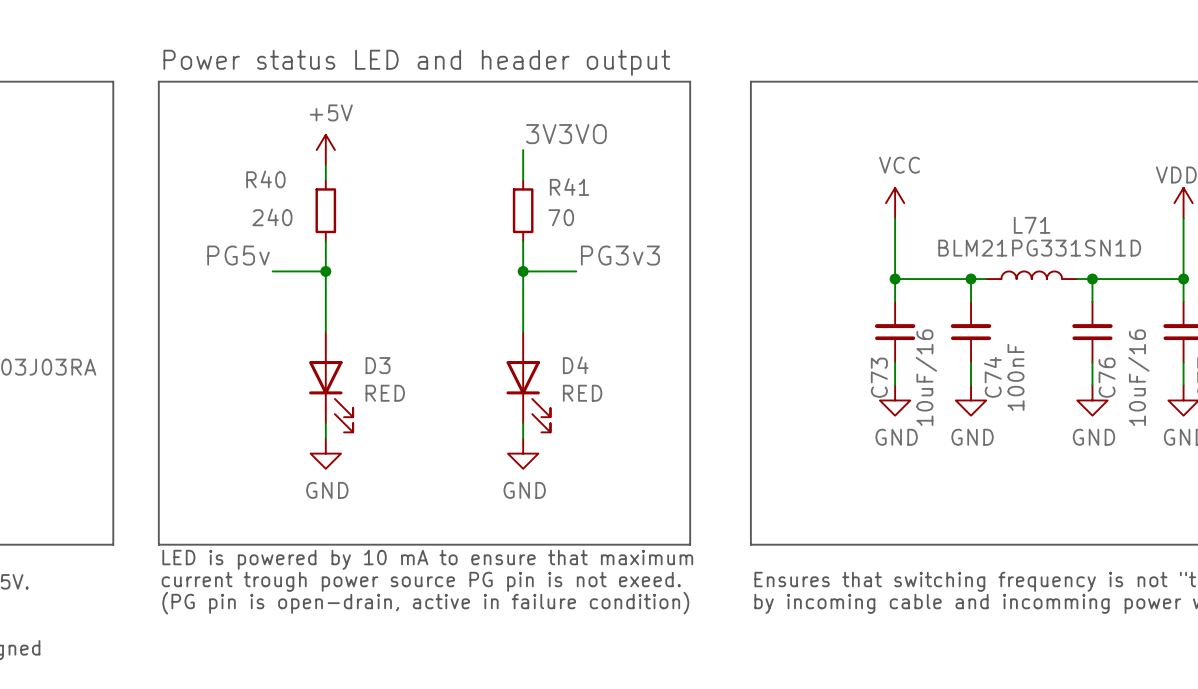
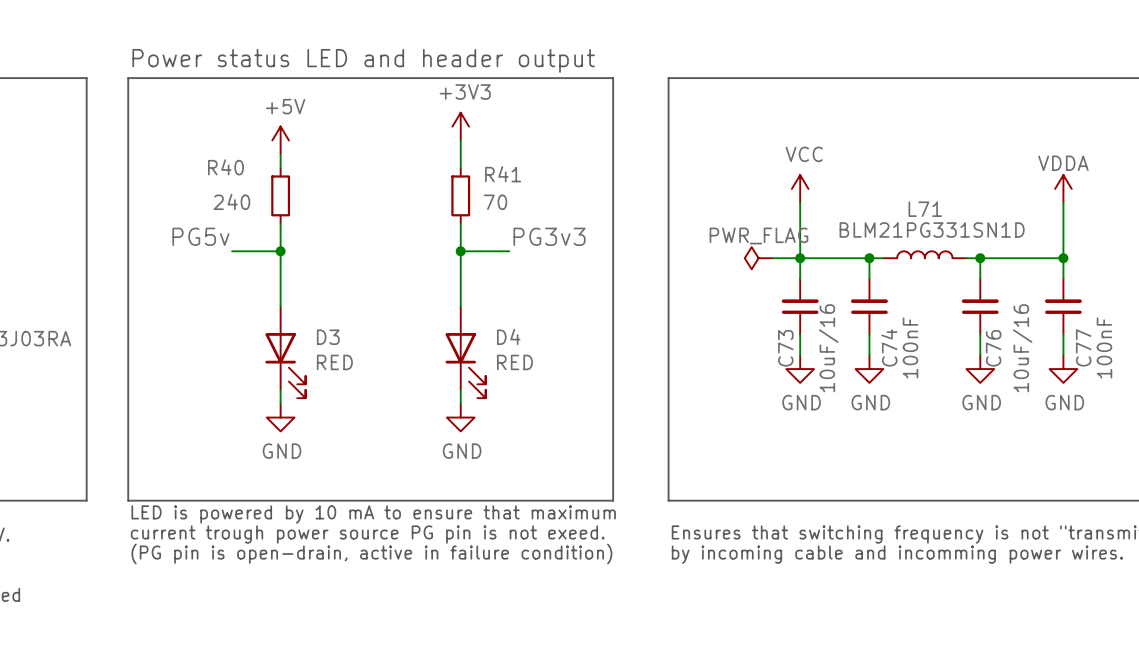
power symbol: none -> +3V3 (460, 126)
label: 3V3VO (566, 134) -> none
power symbol: none -> PWR_FLAG (758, 258)
wire: none -> (772, 258) (800, 258)

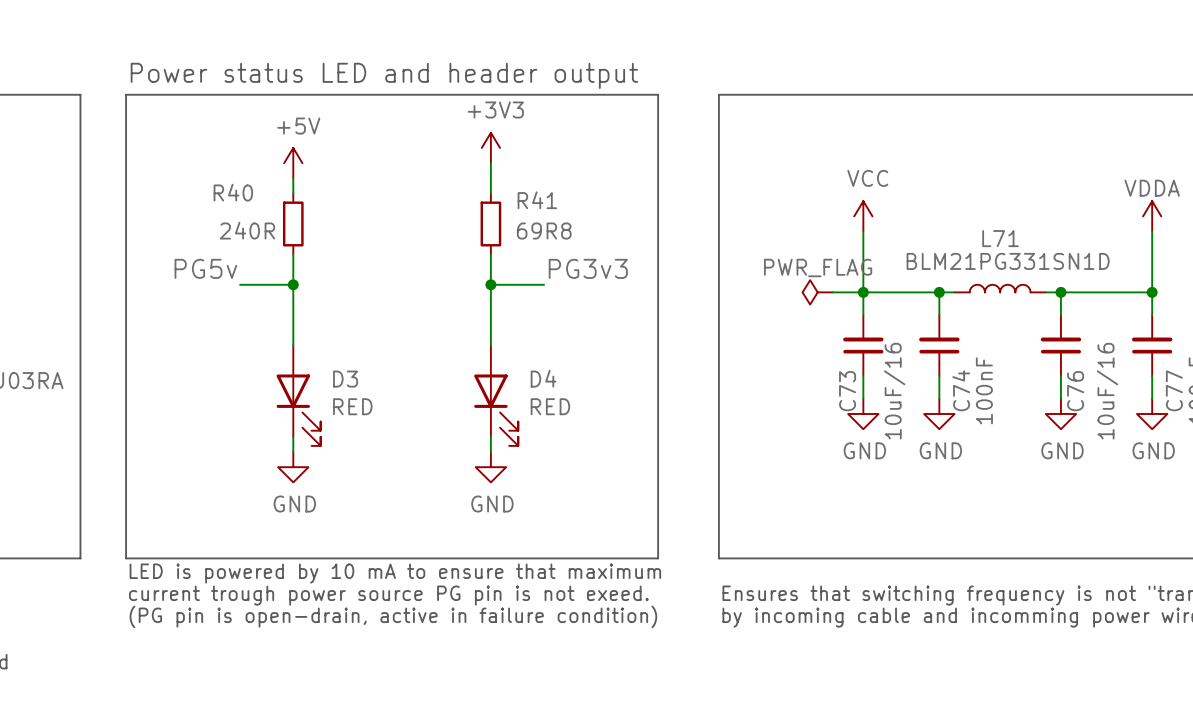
R40 value: 240 (231, 201) -> 240R (247, 230)
R41 value: 70 (495, 202) -> 69R8 (544, 231)

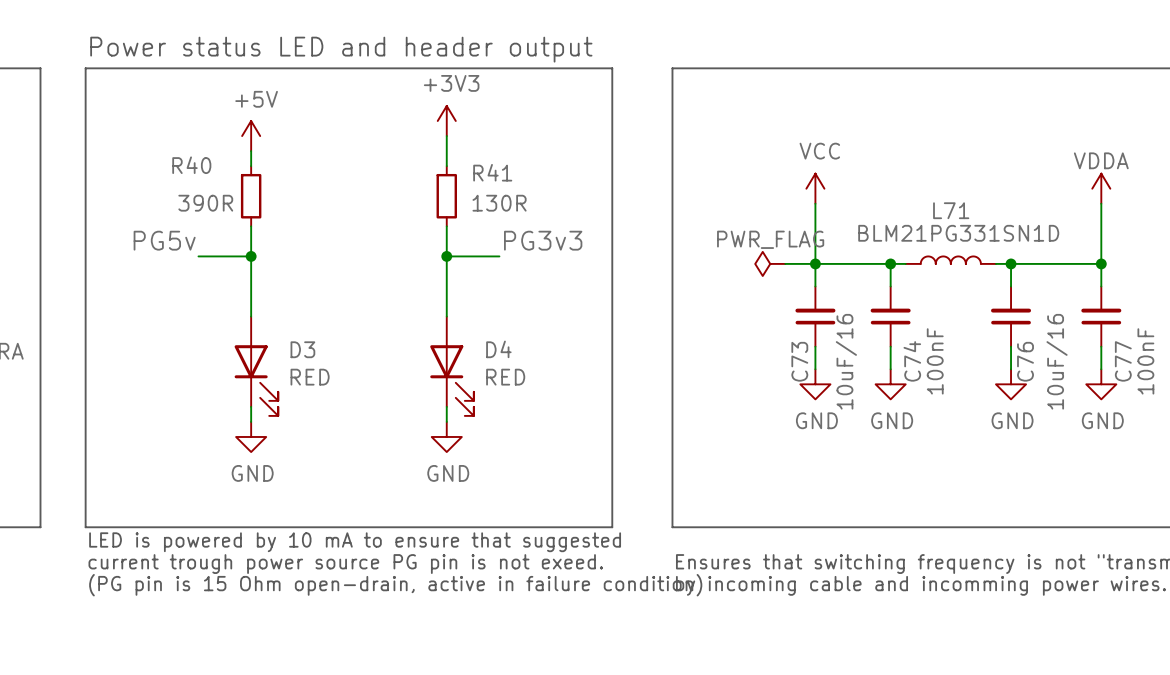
R40 value: 240R (247, 230) -> 390R (205, 203)
R41 value: 69R8 (544, 231) -> 130R (499, 203)
text: LED is powered by 10 mA to ensure that maximum (395, 573) -> LED is powered by 10 mA to ensure that suggested (355, 542)
text: (PG pin is open-drain, active in failure condition) (393, 616) -> (PG pin is 15 Ohm open-drain, active in failure condition) (395, 585)

